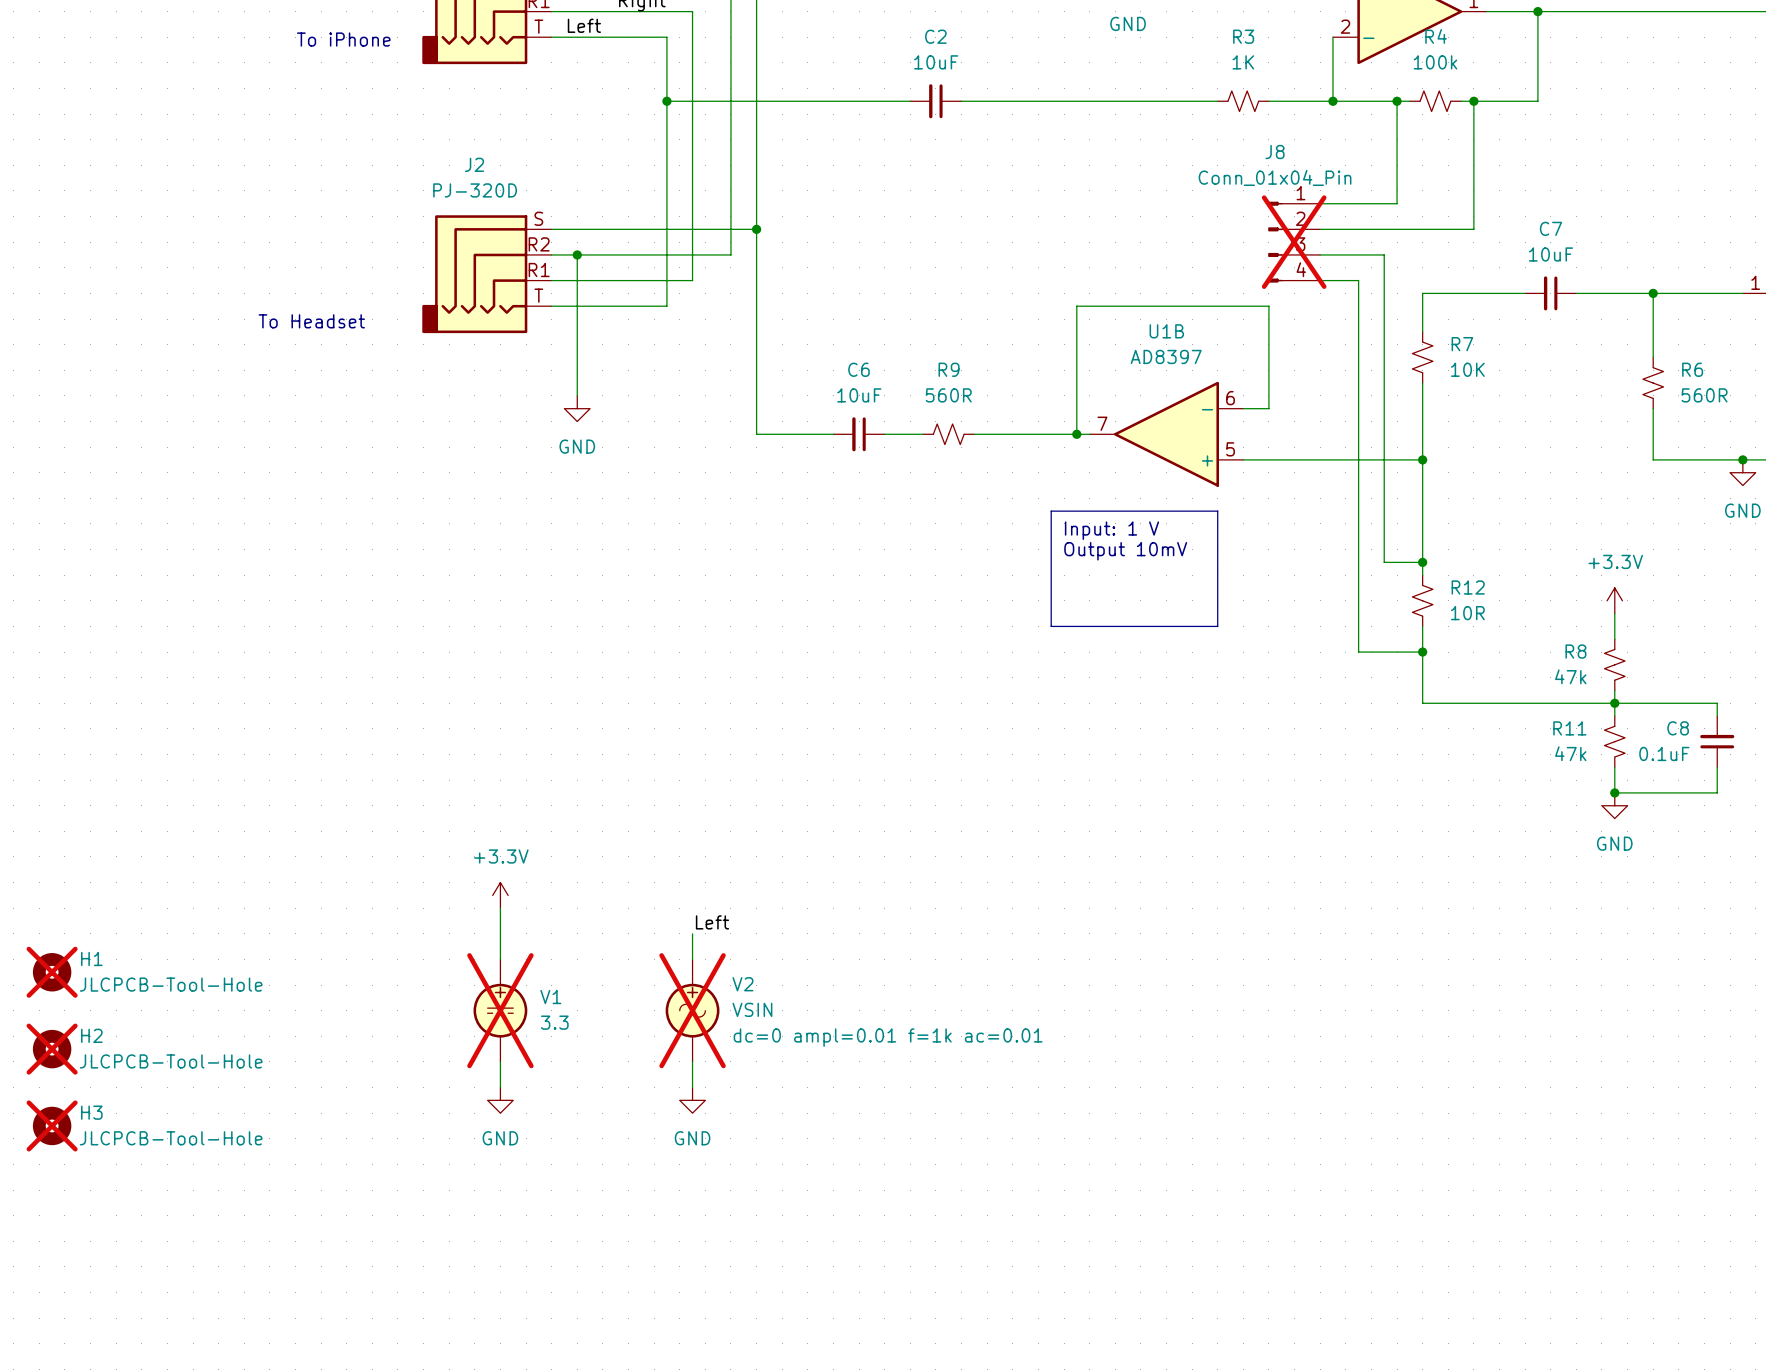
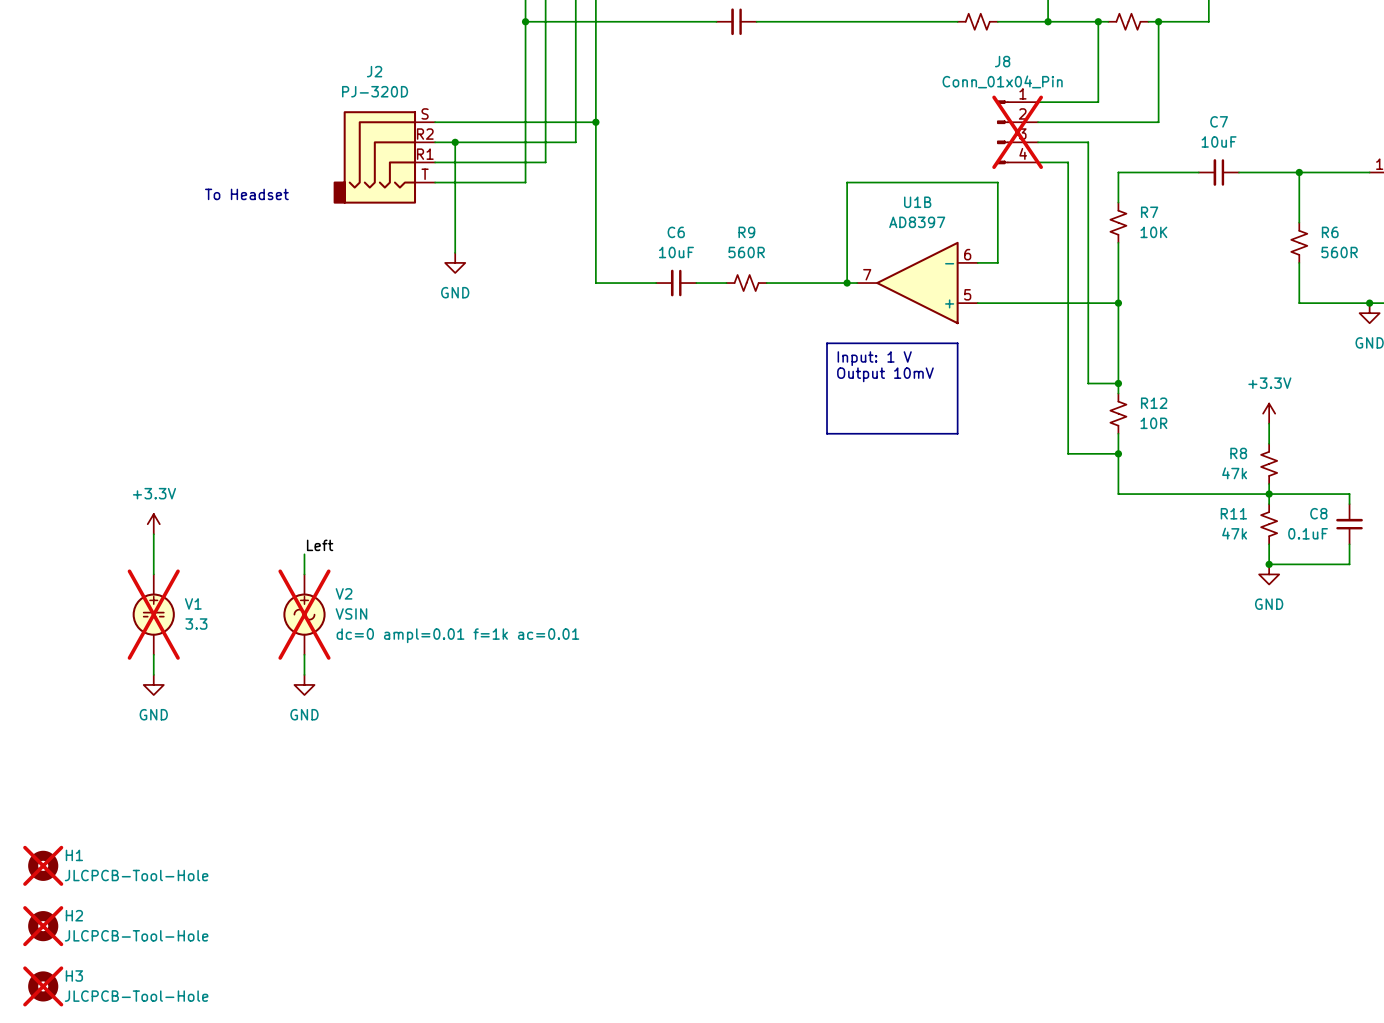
power symbol: none -> +3.3V (153, 524)
wire: none -> (153, 534) (153, 574)
label: none -> Left (320, 545)
wire: none -> (304, 554) (304, 574)
power symbol: +3.3V (500, 895) -> none
wire: none -> (153, 654) (153, 674)
wire: (500, 908) (500, 959) -> none
label: Left (712, 922) -> none
wire: (692, 933) (692, 959) -> none
power symbol: none -> GND (153, 684)
power symbol: none -> GND (304, 684)
H1 position: (52, 972) -> (43, 865)
V1 position: (500, 1010) -> (153, 614)
V2 position: (692, 1010) -> (304, 614)
H2 position: (52, 1049) -> (43, 926)
wire: (500, 1061) (500, 1087) -> (304, 654) (304, 674)
wire: (692, 1061) (692, 1087) -> none
power symbol: GND (500, 1100) -> none
power symbol: GND (692, 1100) -> none
H3 position: (52, 1125) -> (43, 986)

